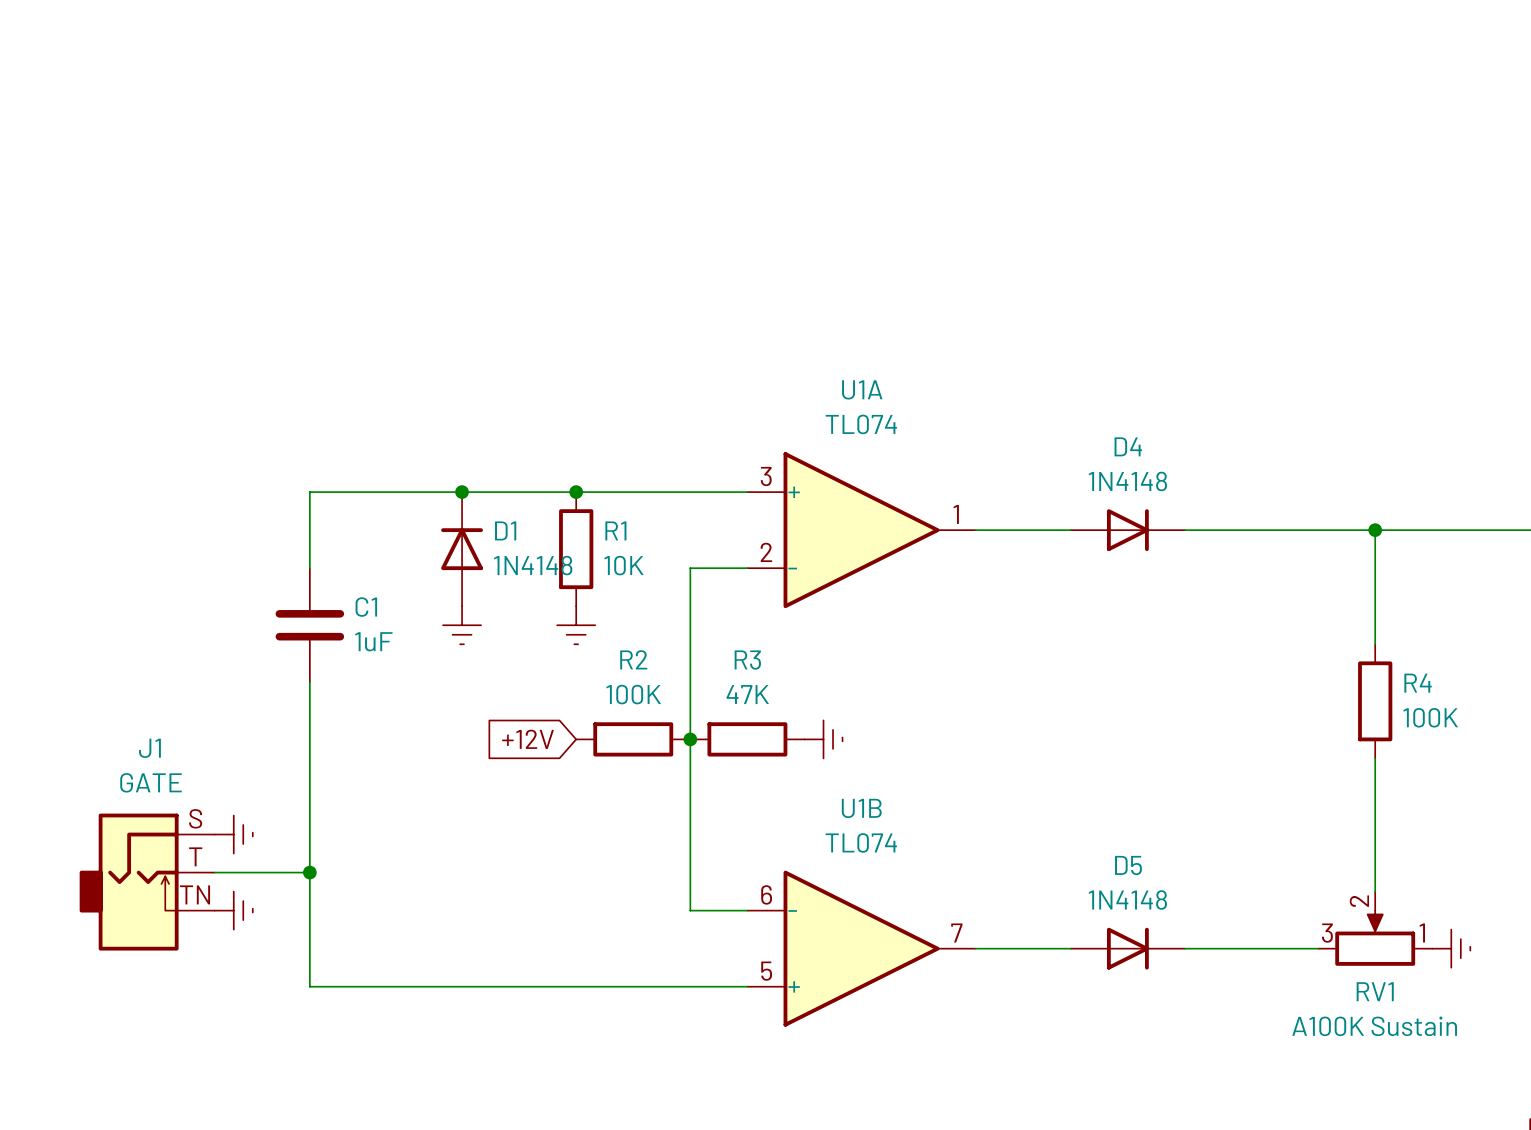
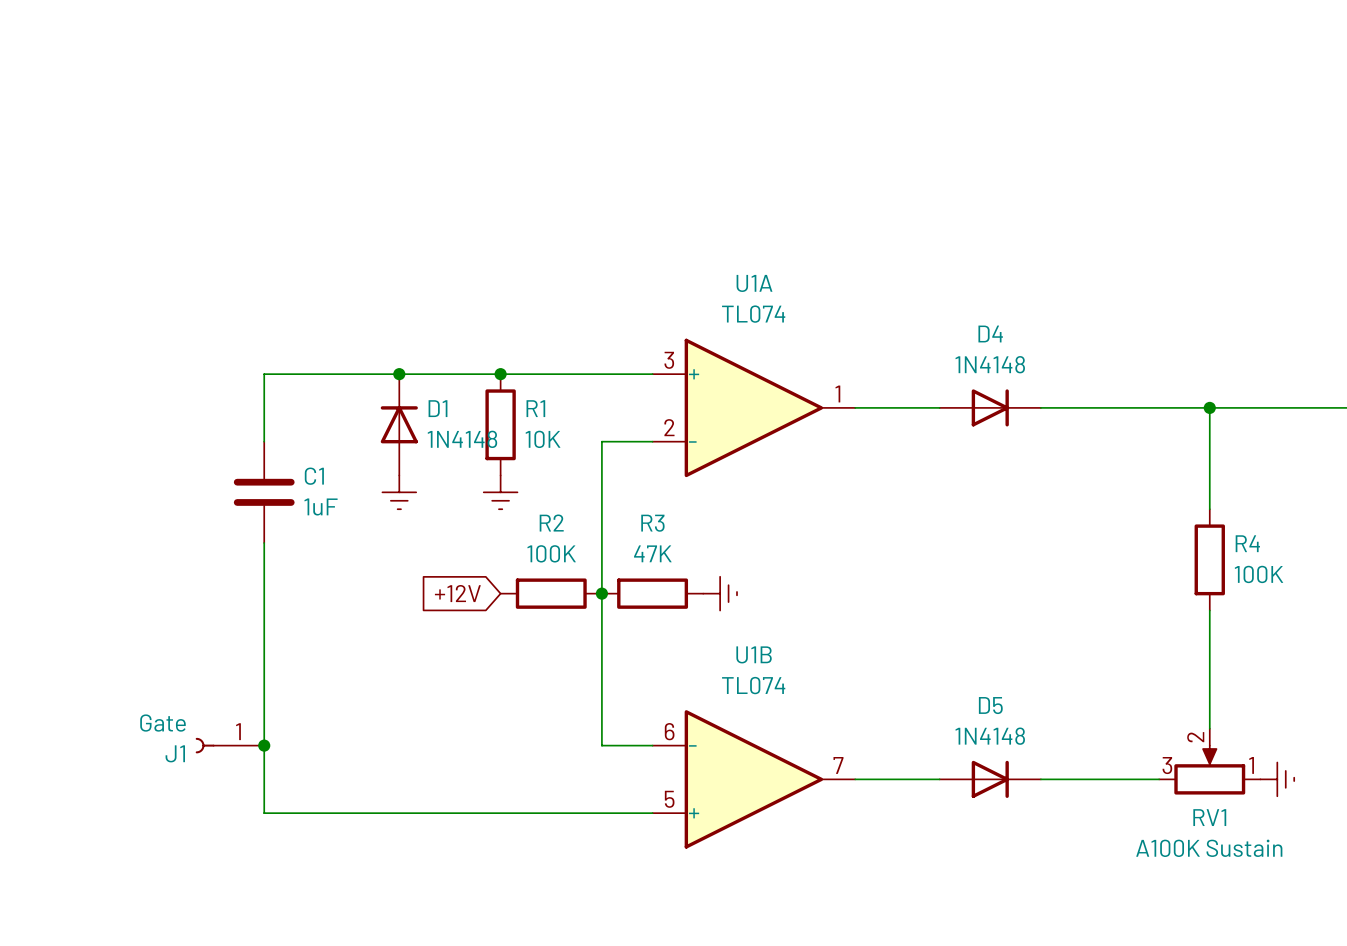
J1 name position: J1 (149, 748) -> J1 (175, 753)
J1 value: GATE (151, 782) -> Gate (162, 723)
J1 symbol: [79, 813, 215, 951] -> [195, 737, 265, 754]
power symbol: (233, 834) -> none
wire: (214, 872) (309, 872) -> none
junction position: (309, 872) -> (264, 745)
power symbol: (233, 910) -> none

